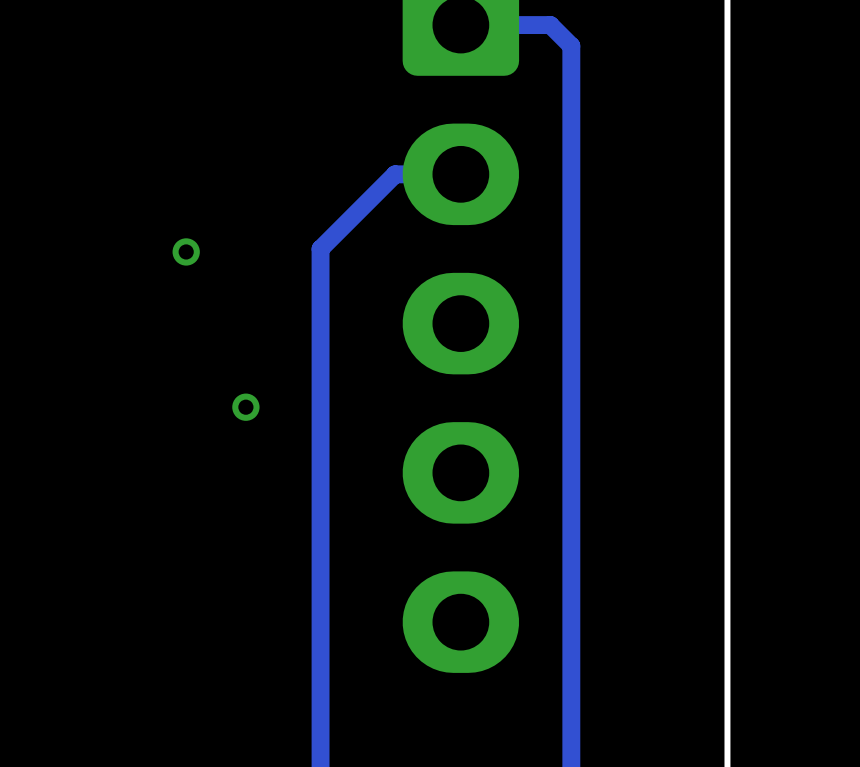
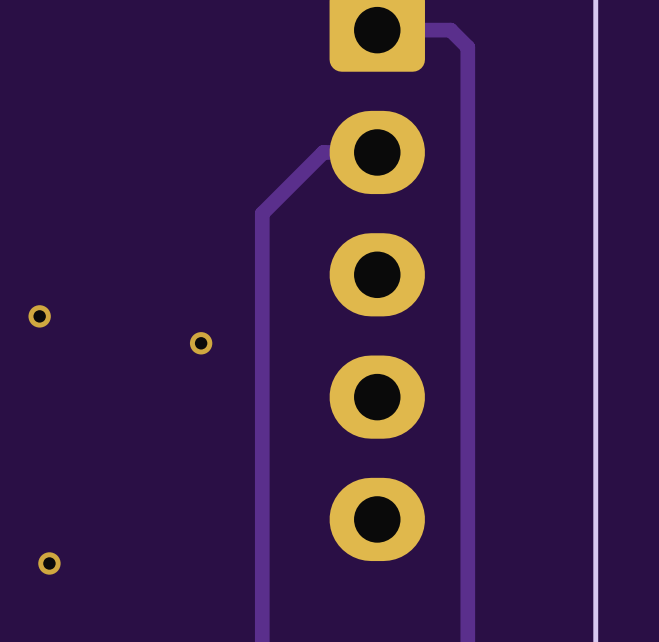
via: (186, 251) -> none
via: none -> (39, 316)
via: none -> (49, 563)

